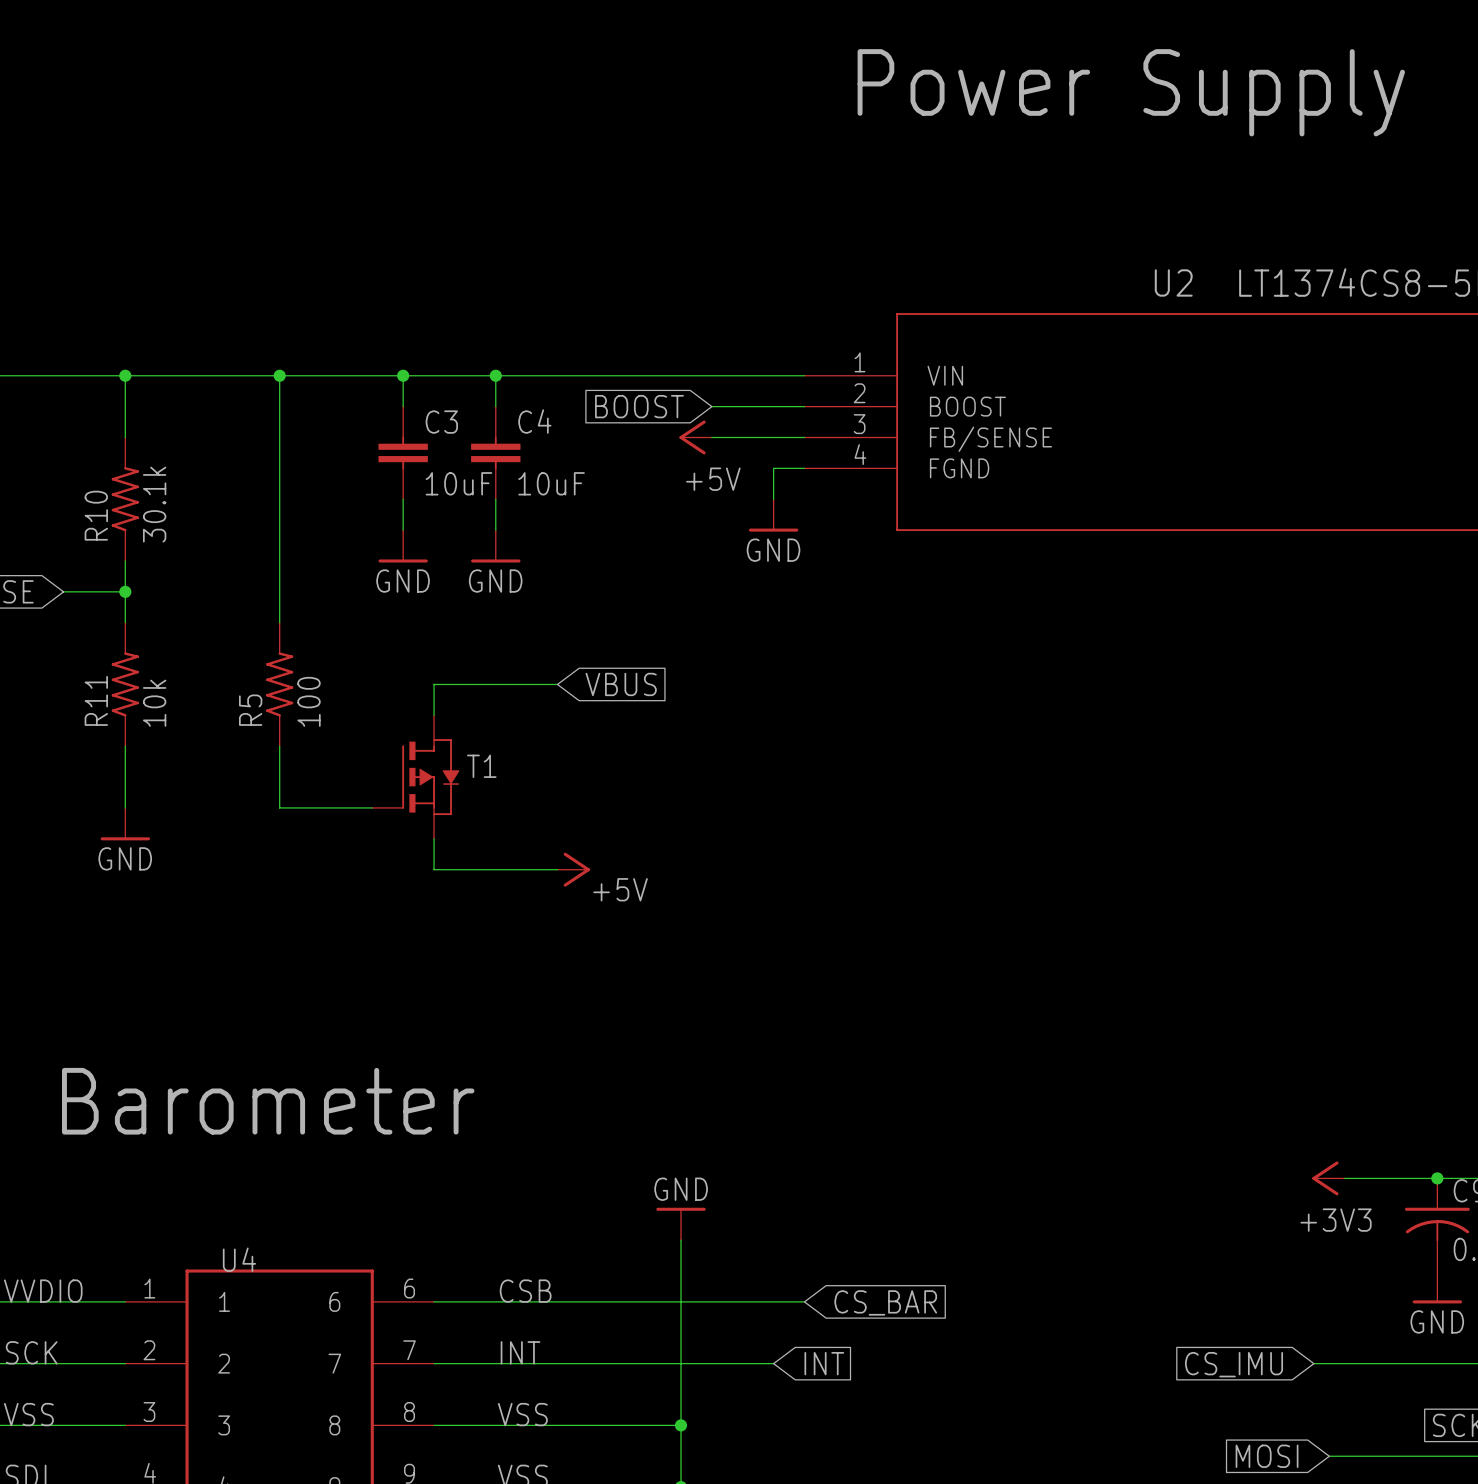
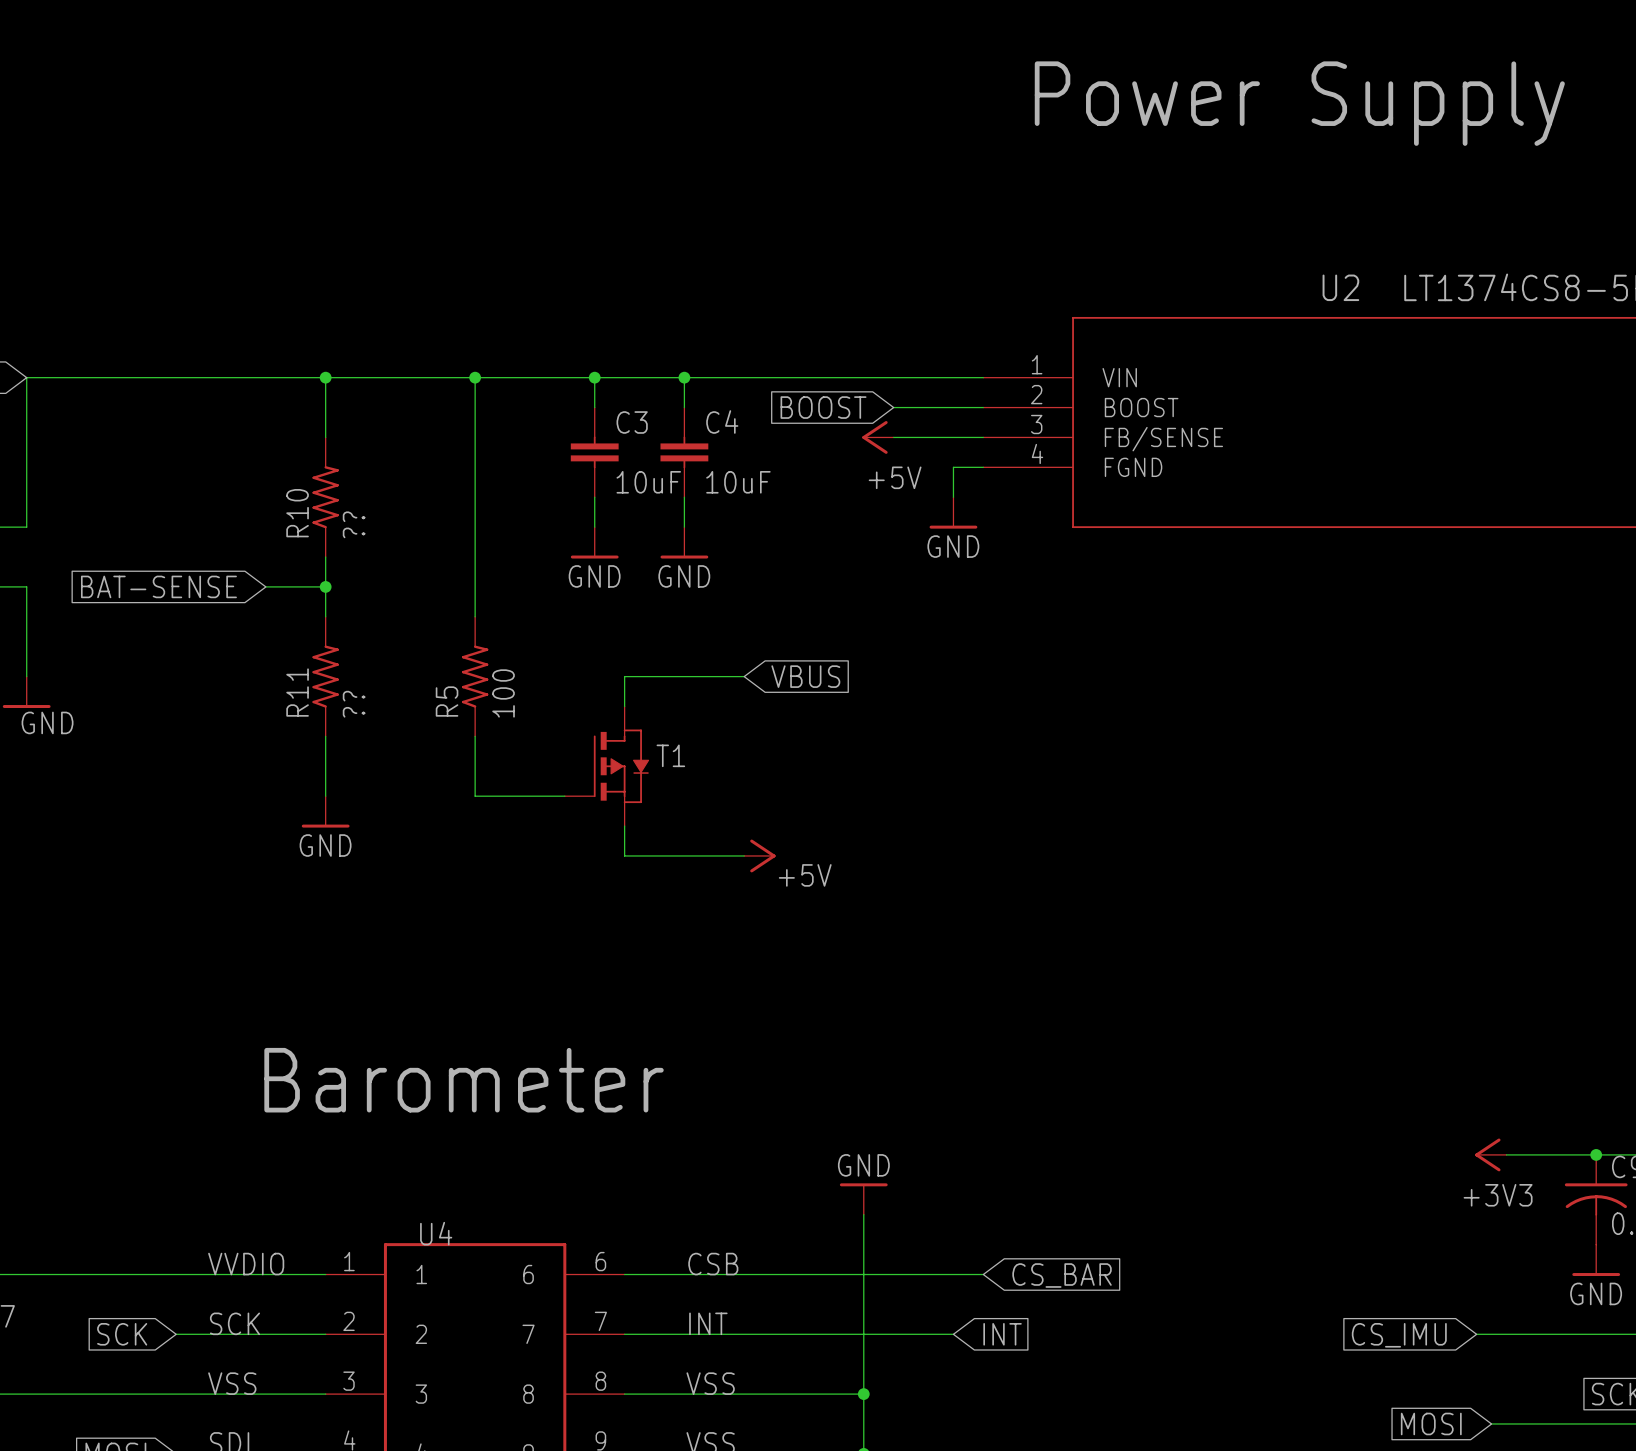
R10 value: 30.1k (154, 504) -> ?? (354, 524)
R11 value: 10k (154, 703) -> ?? (354, 704)

